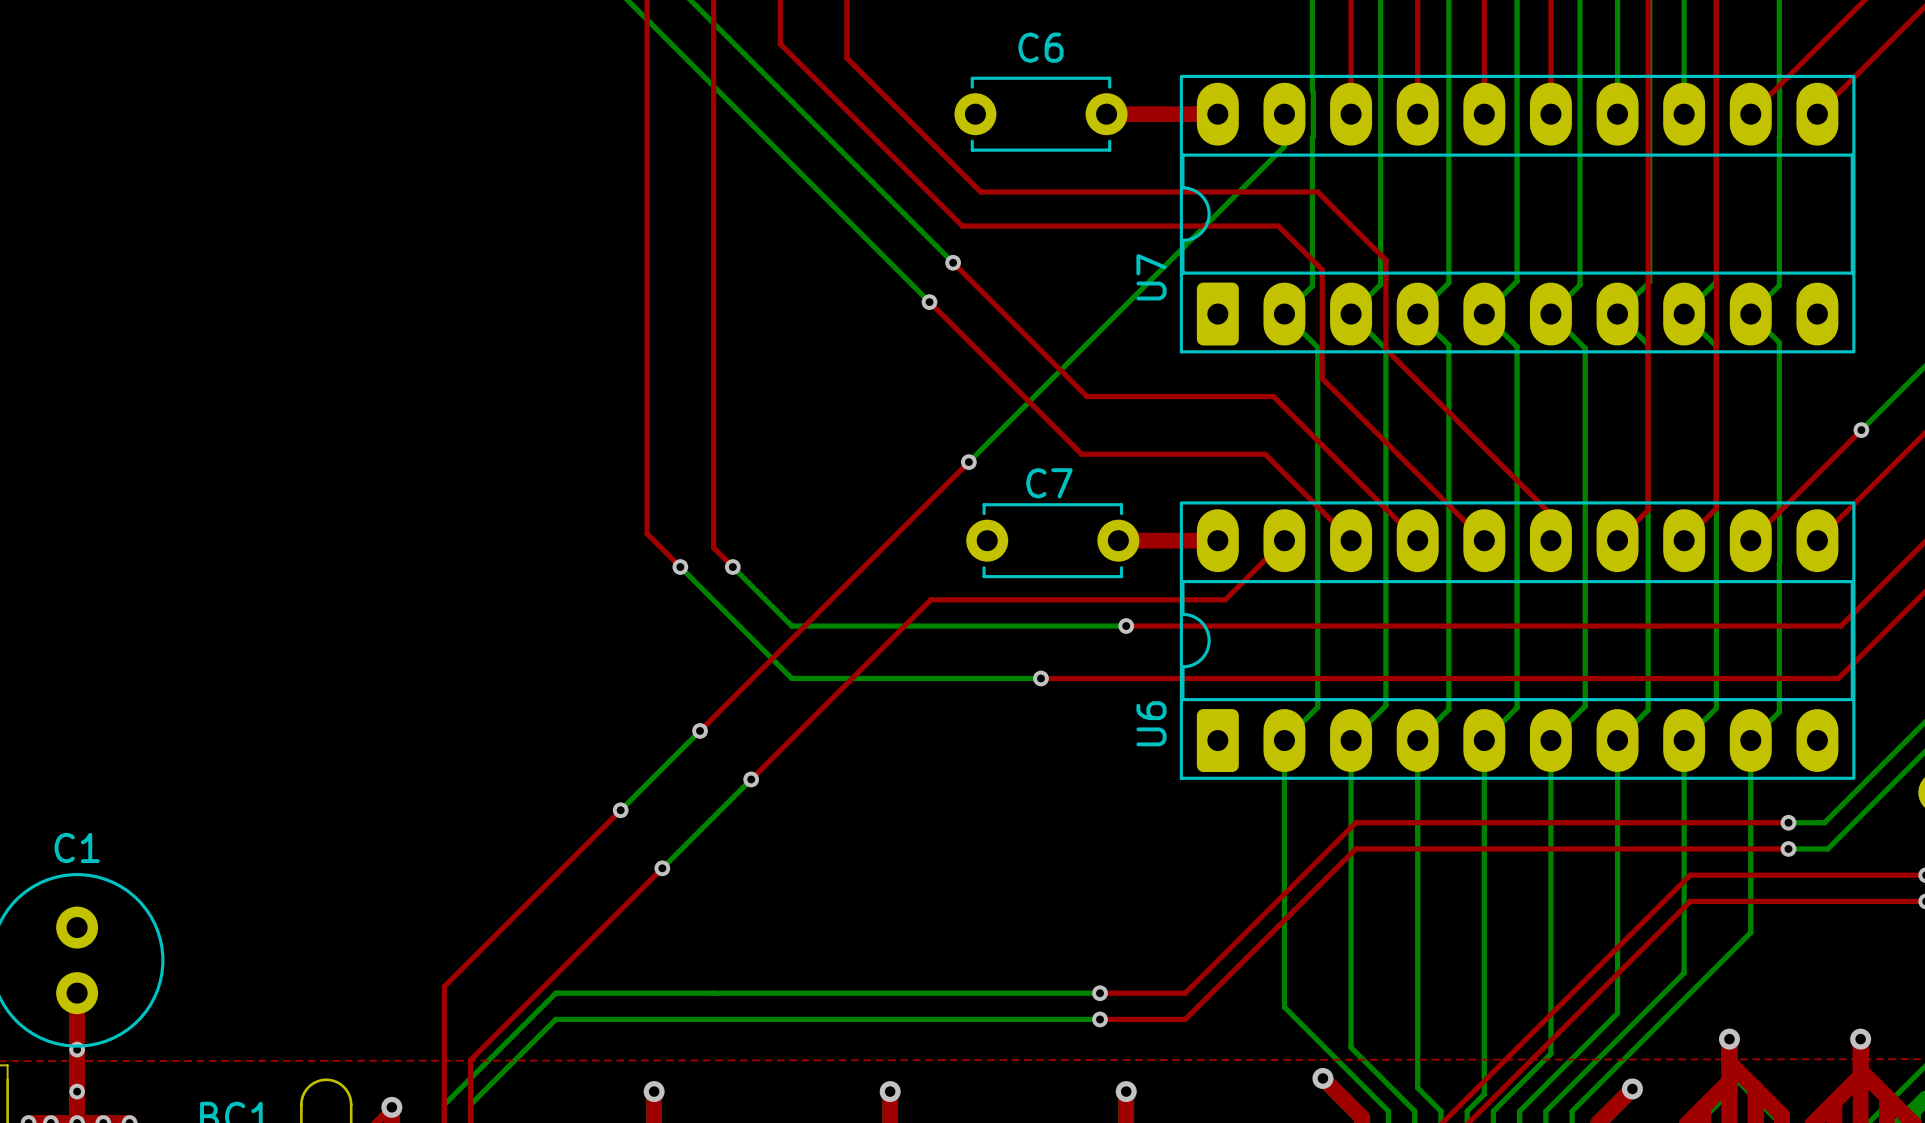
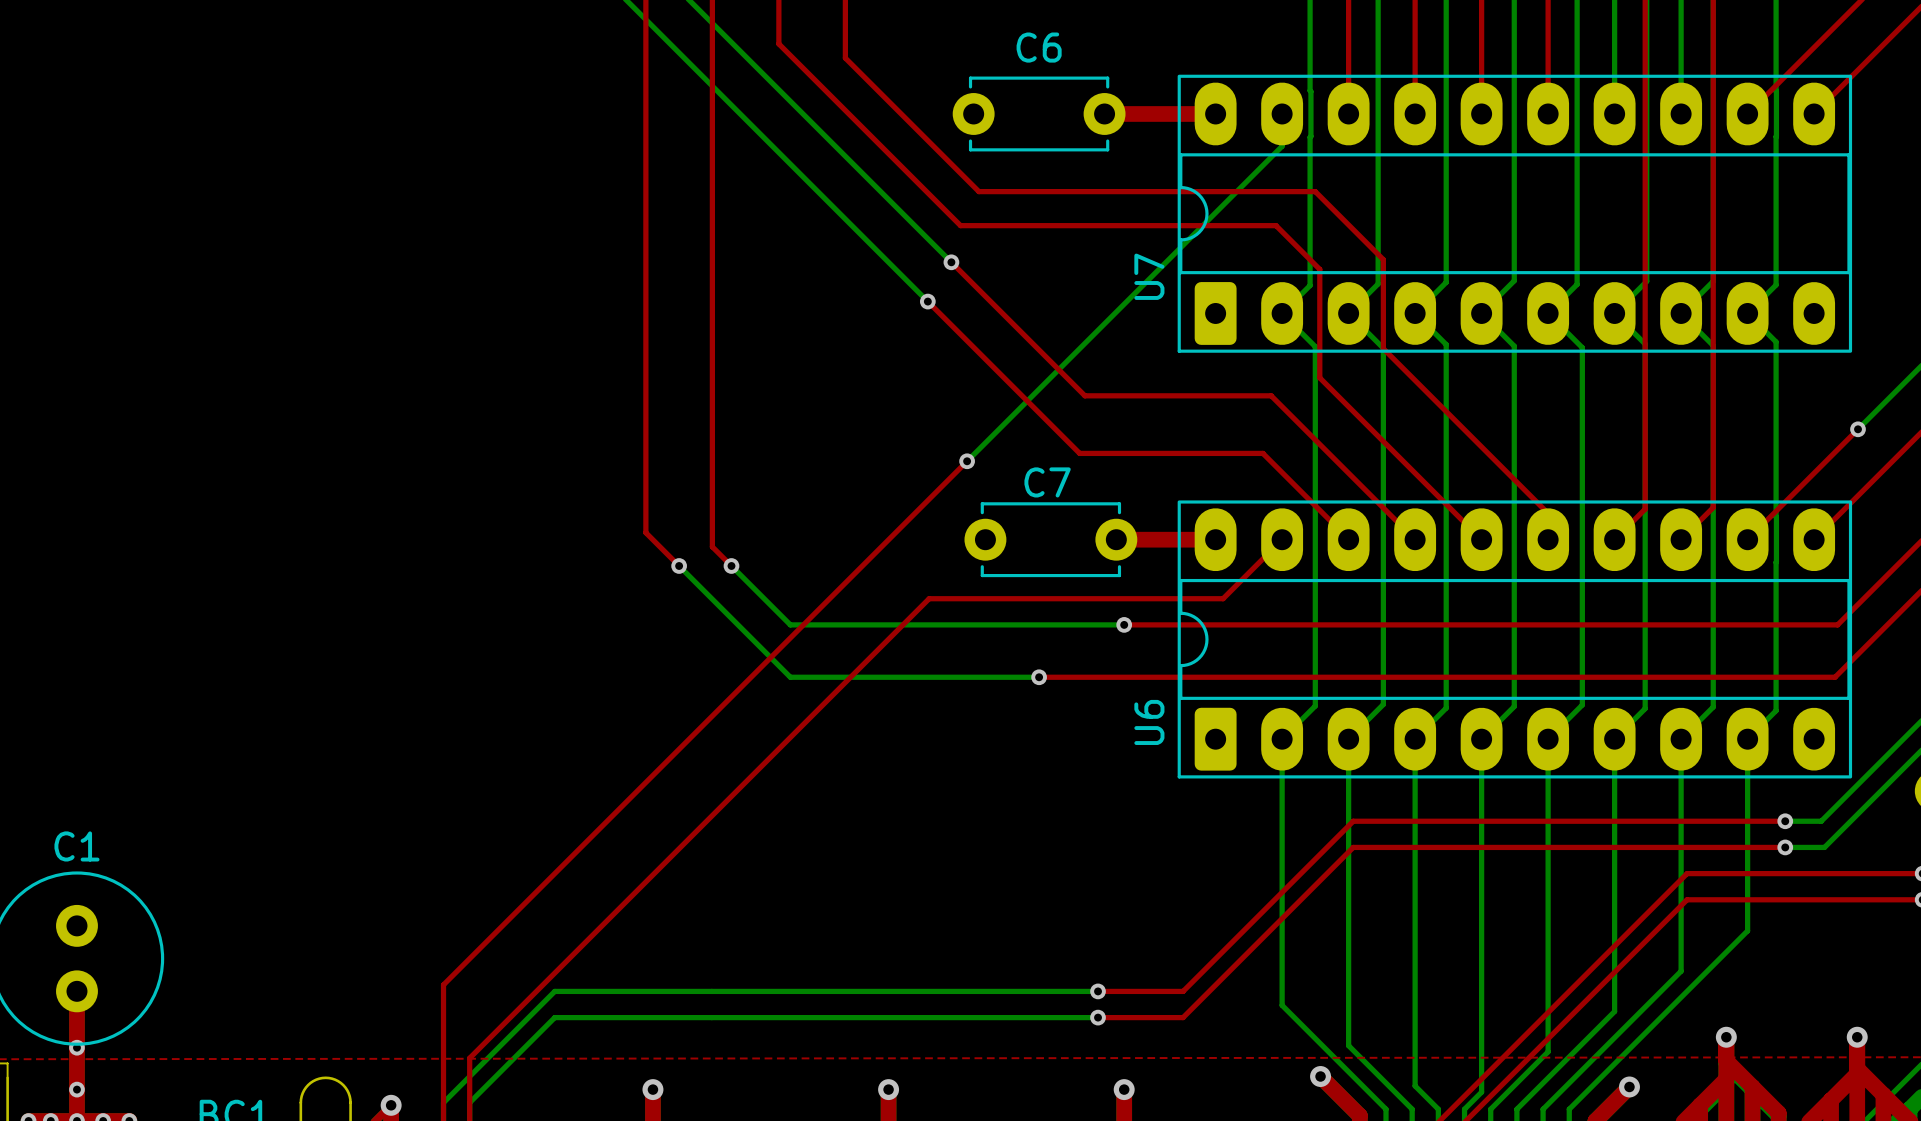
top track: none -> (698, 729) (619, 808)
bottom track: (700, 730) (620, 810) -> none
via: (700, 730) -> none
top track: none -> (749, 778) (661, 866)
bottom track: (751, 779) (662, 868) -> none
via: (751, 779) -> none
via: (620, 810) -> none
via: (662, 868) -> none

